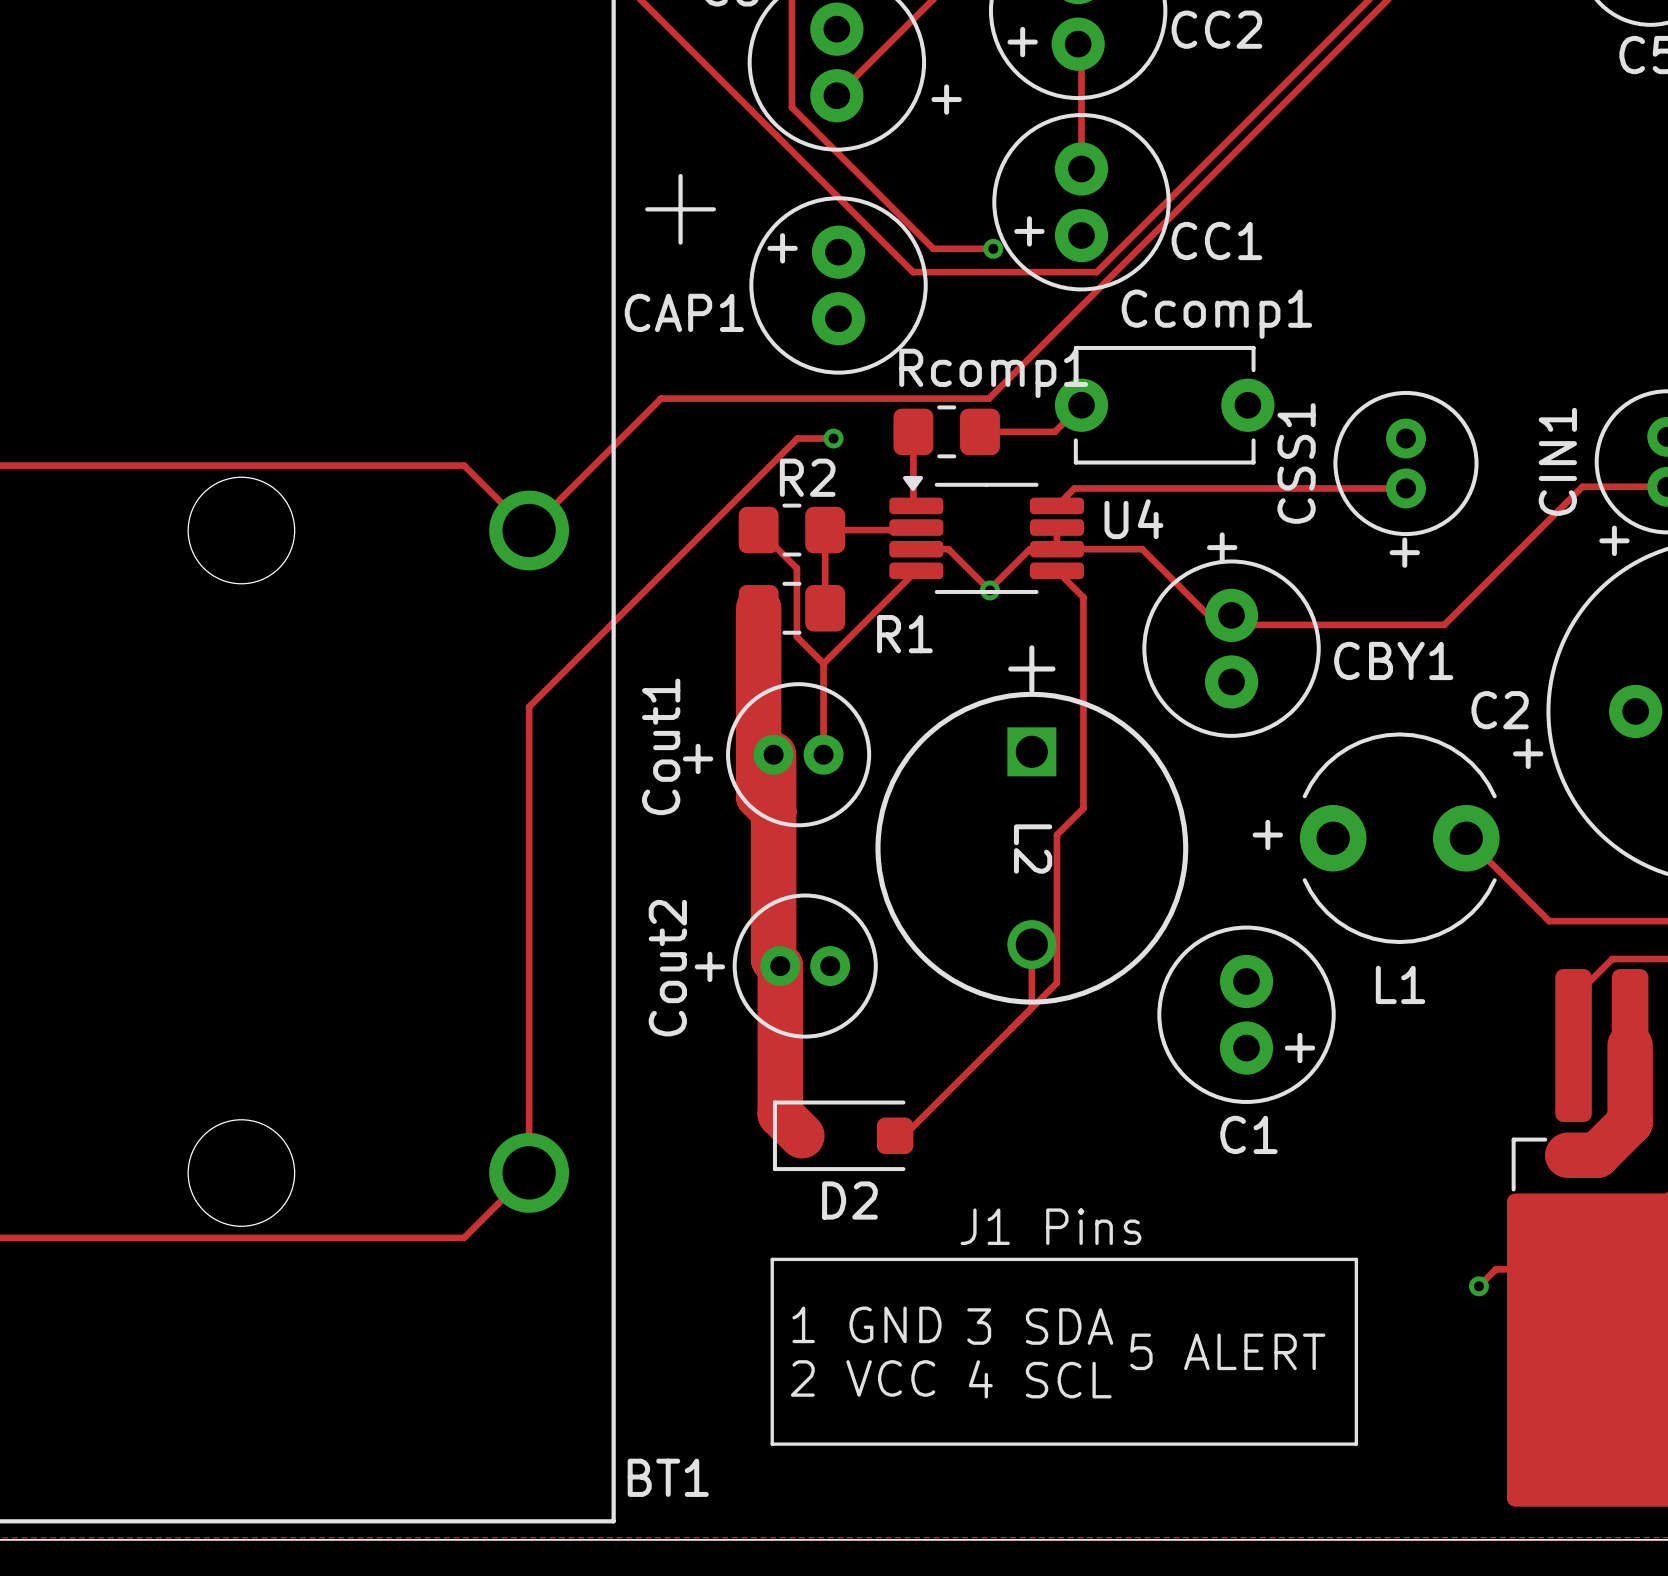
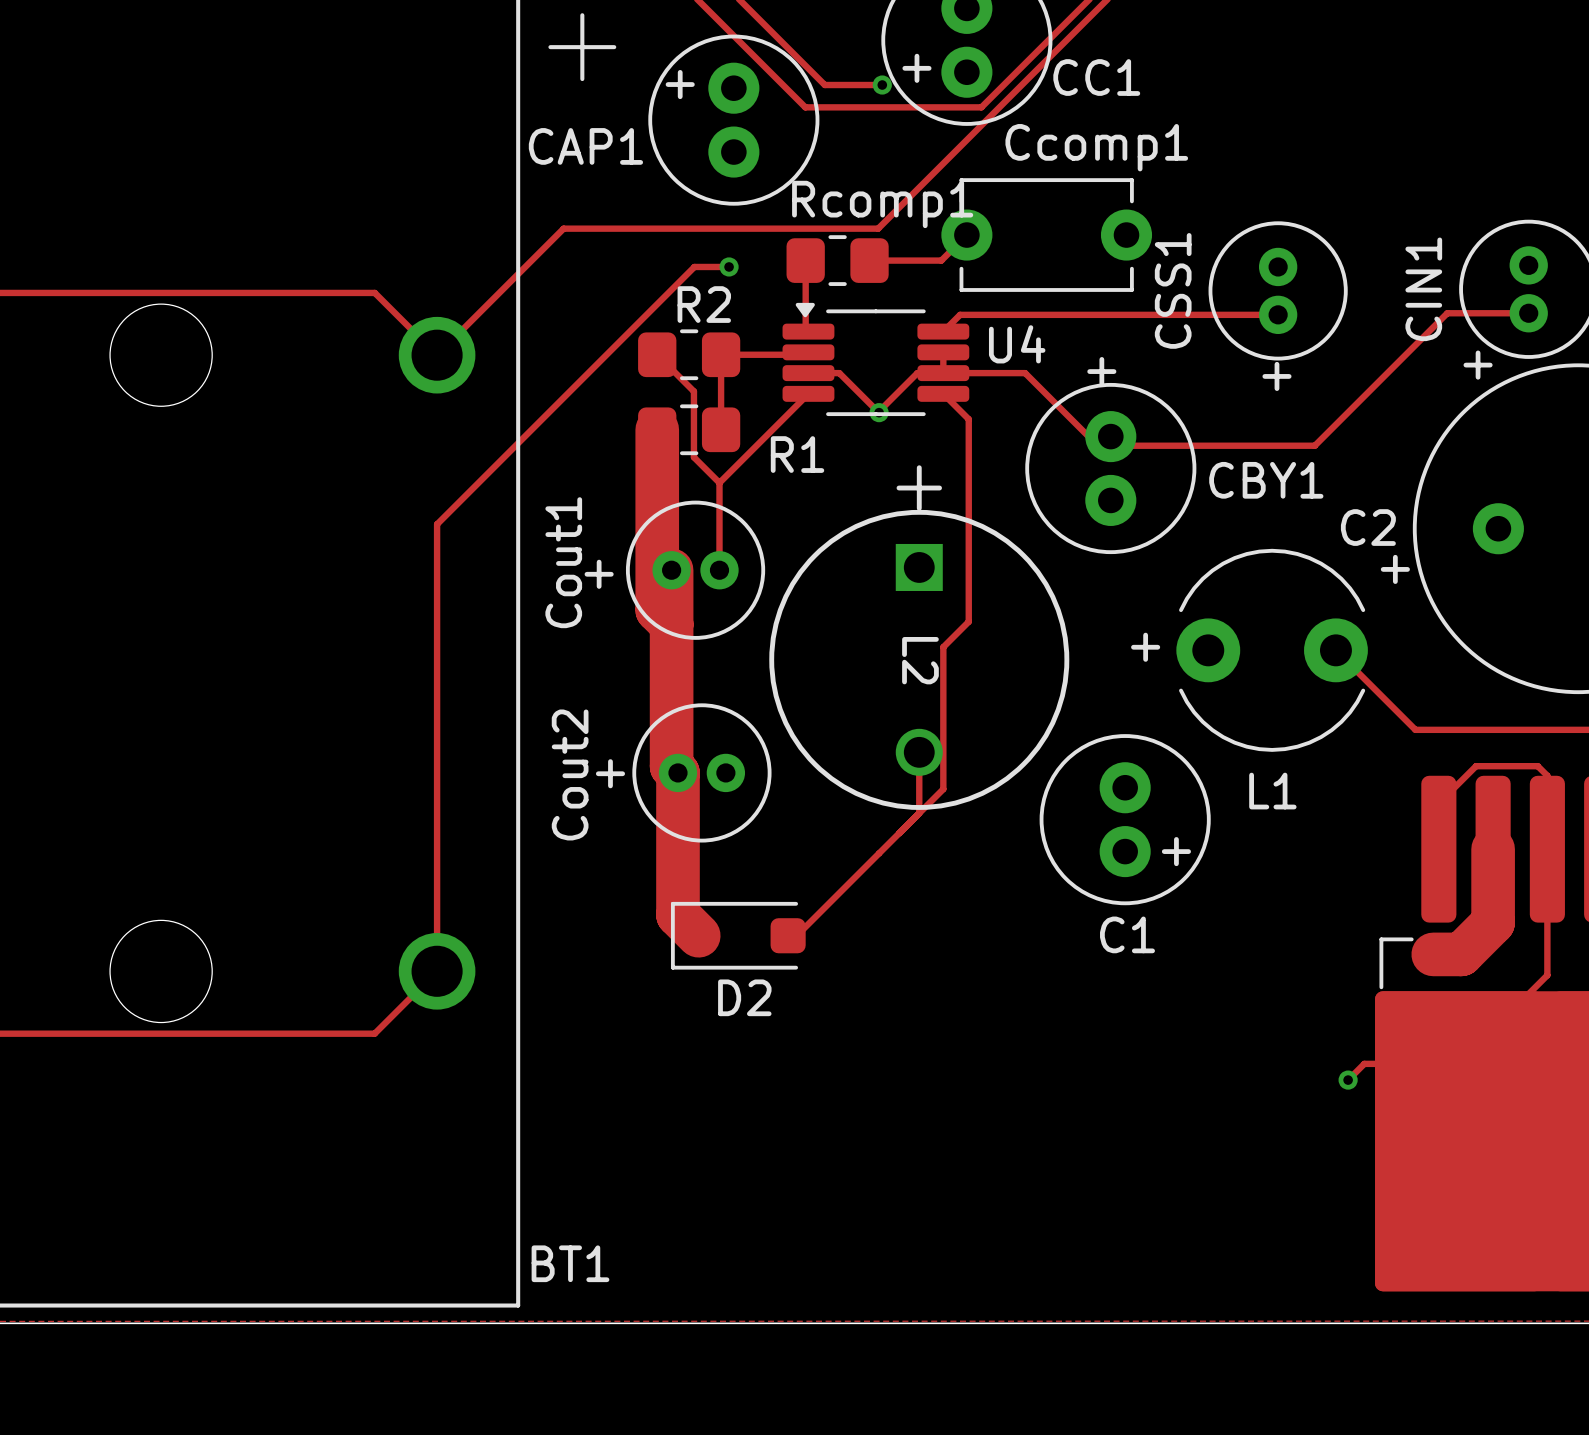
text: J1 Pins (1051, 1226) -> none
line: (772, 1259) (1356, 1259) (1356, 1444) (772, 1444) (772, 1259) -> none
text: 1 GND (867, 1324) -> none
text: 3 SDA (1040, 1326) -> none
text: 5 ALERT (1227, 1351) -> none
text: 2 VCC (863, 1378) -> none
text: 4 SCL (1040, 1379) -> none

